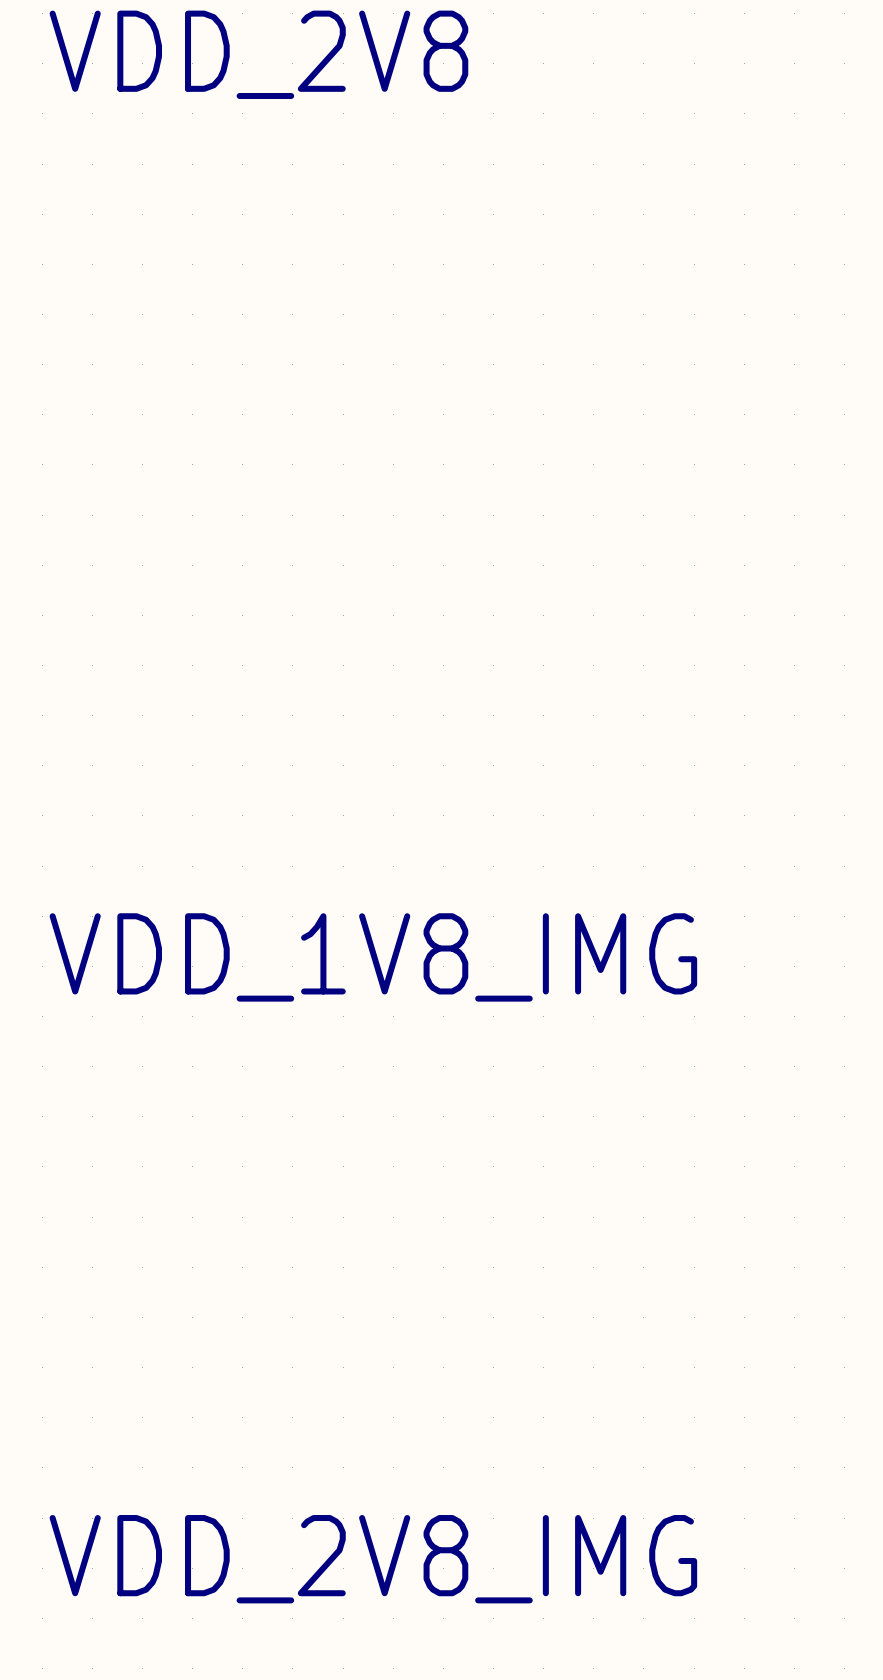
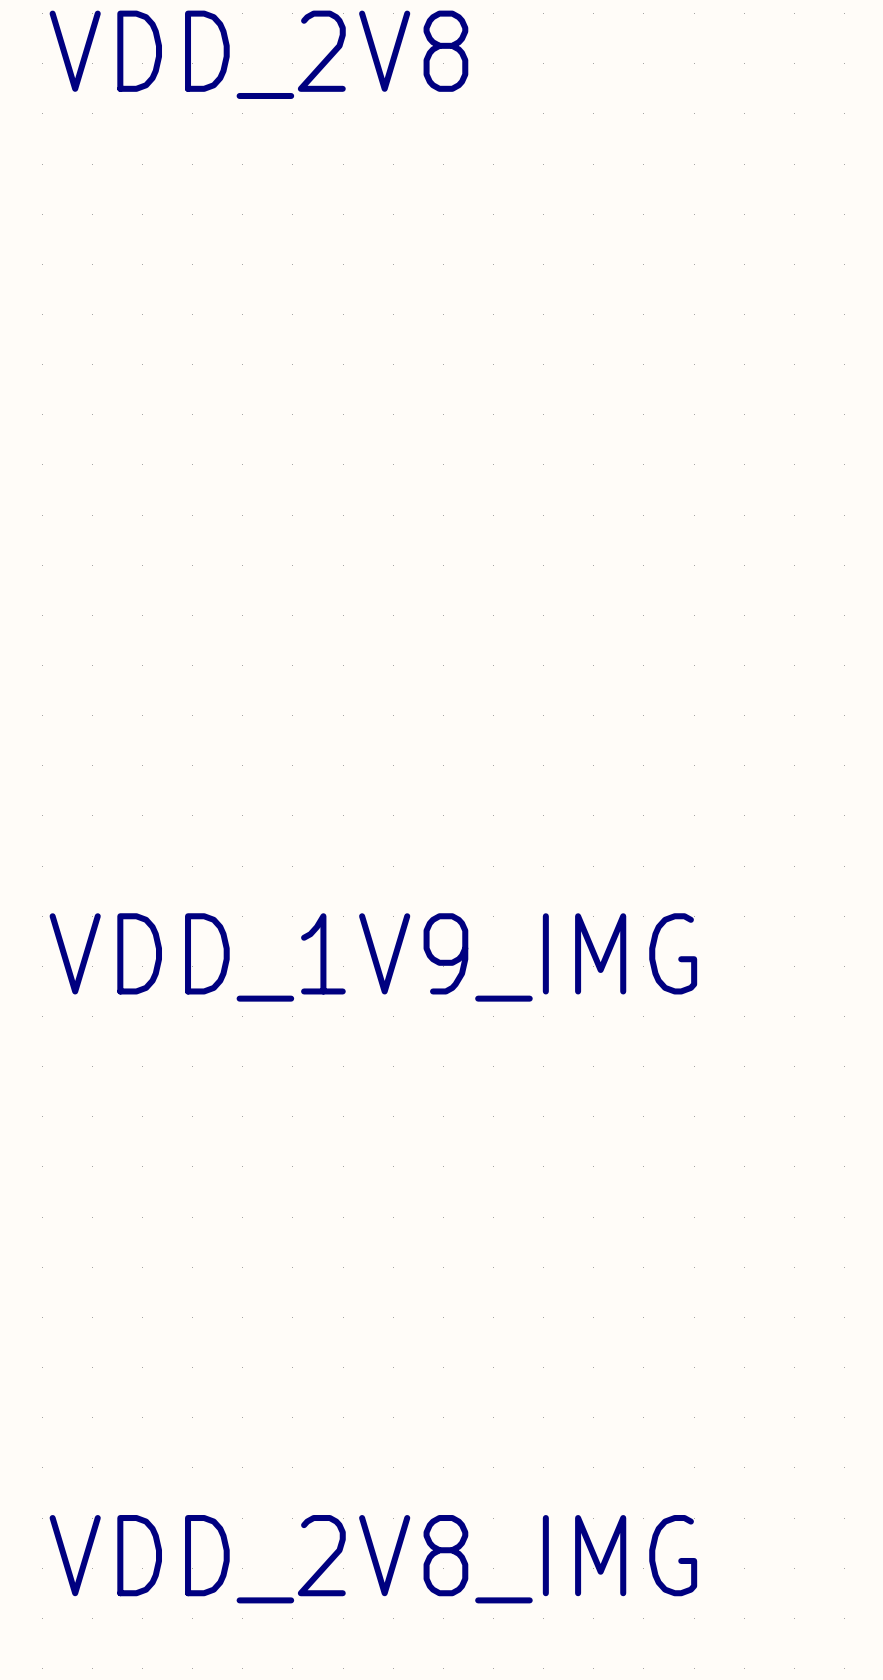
text: VDD_1V8_IMG (373, 957) -> VDD_1V9_IMG (373, 957)

